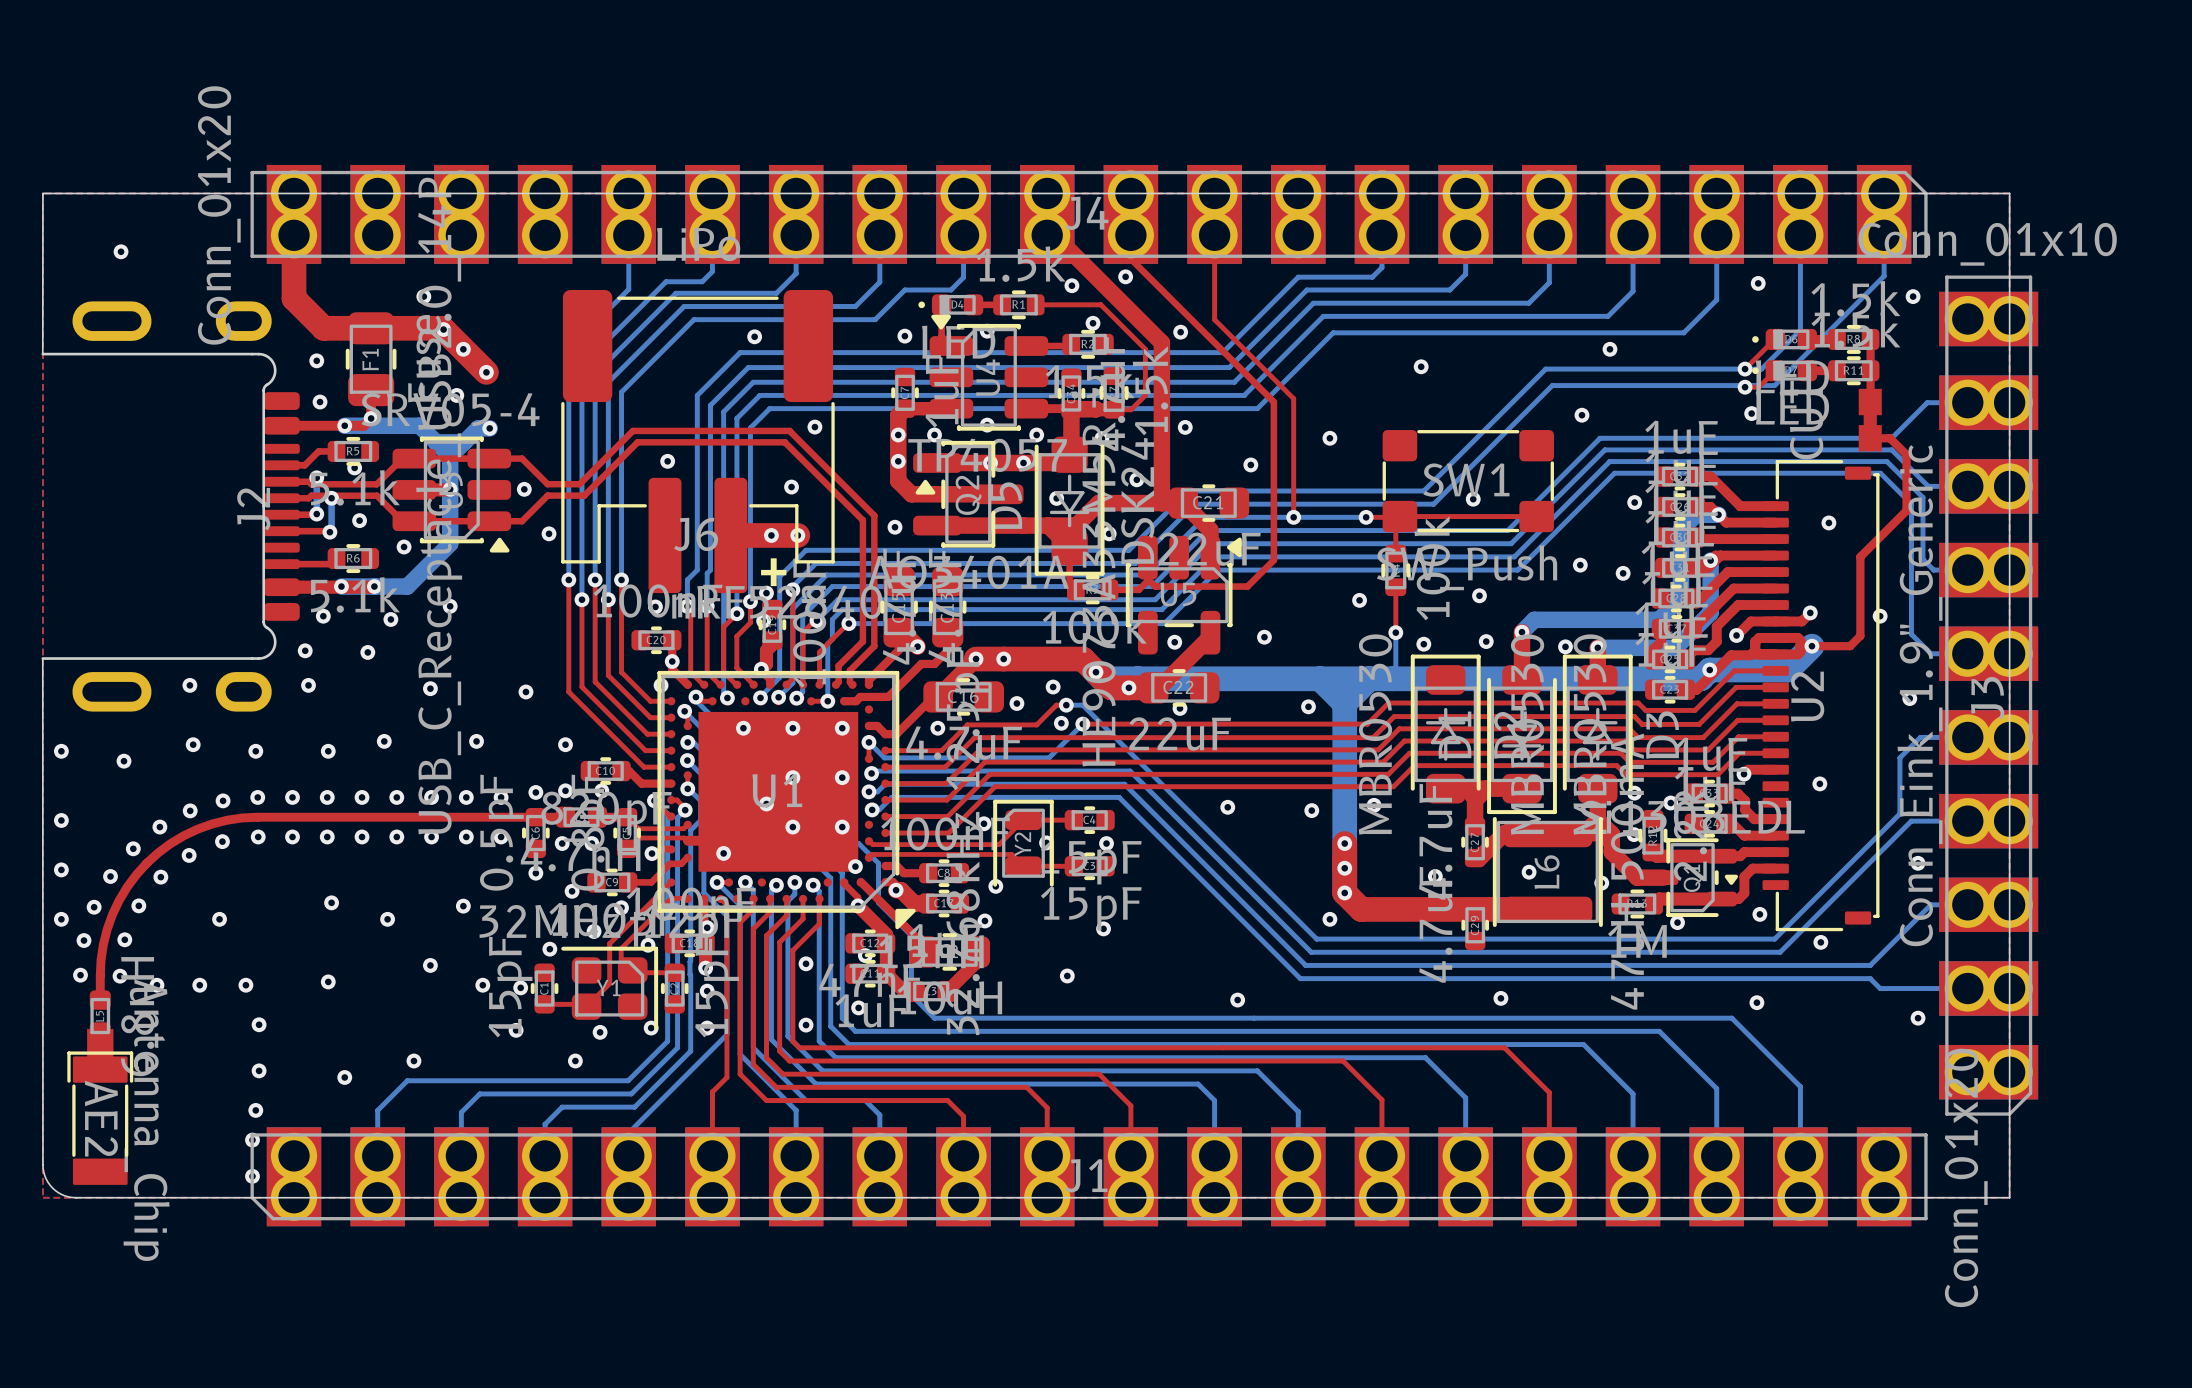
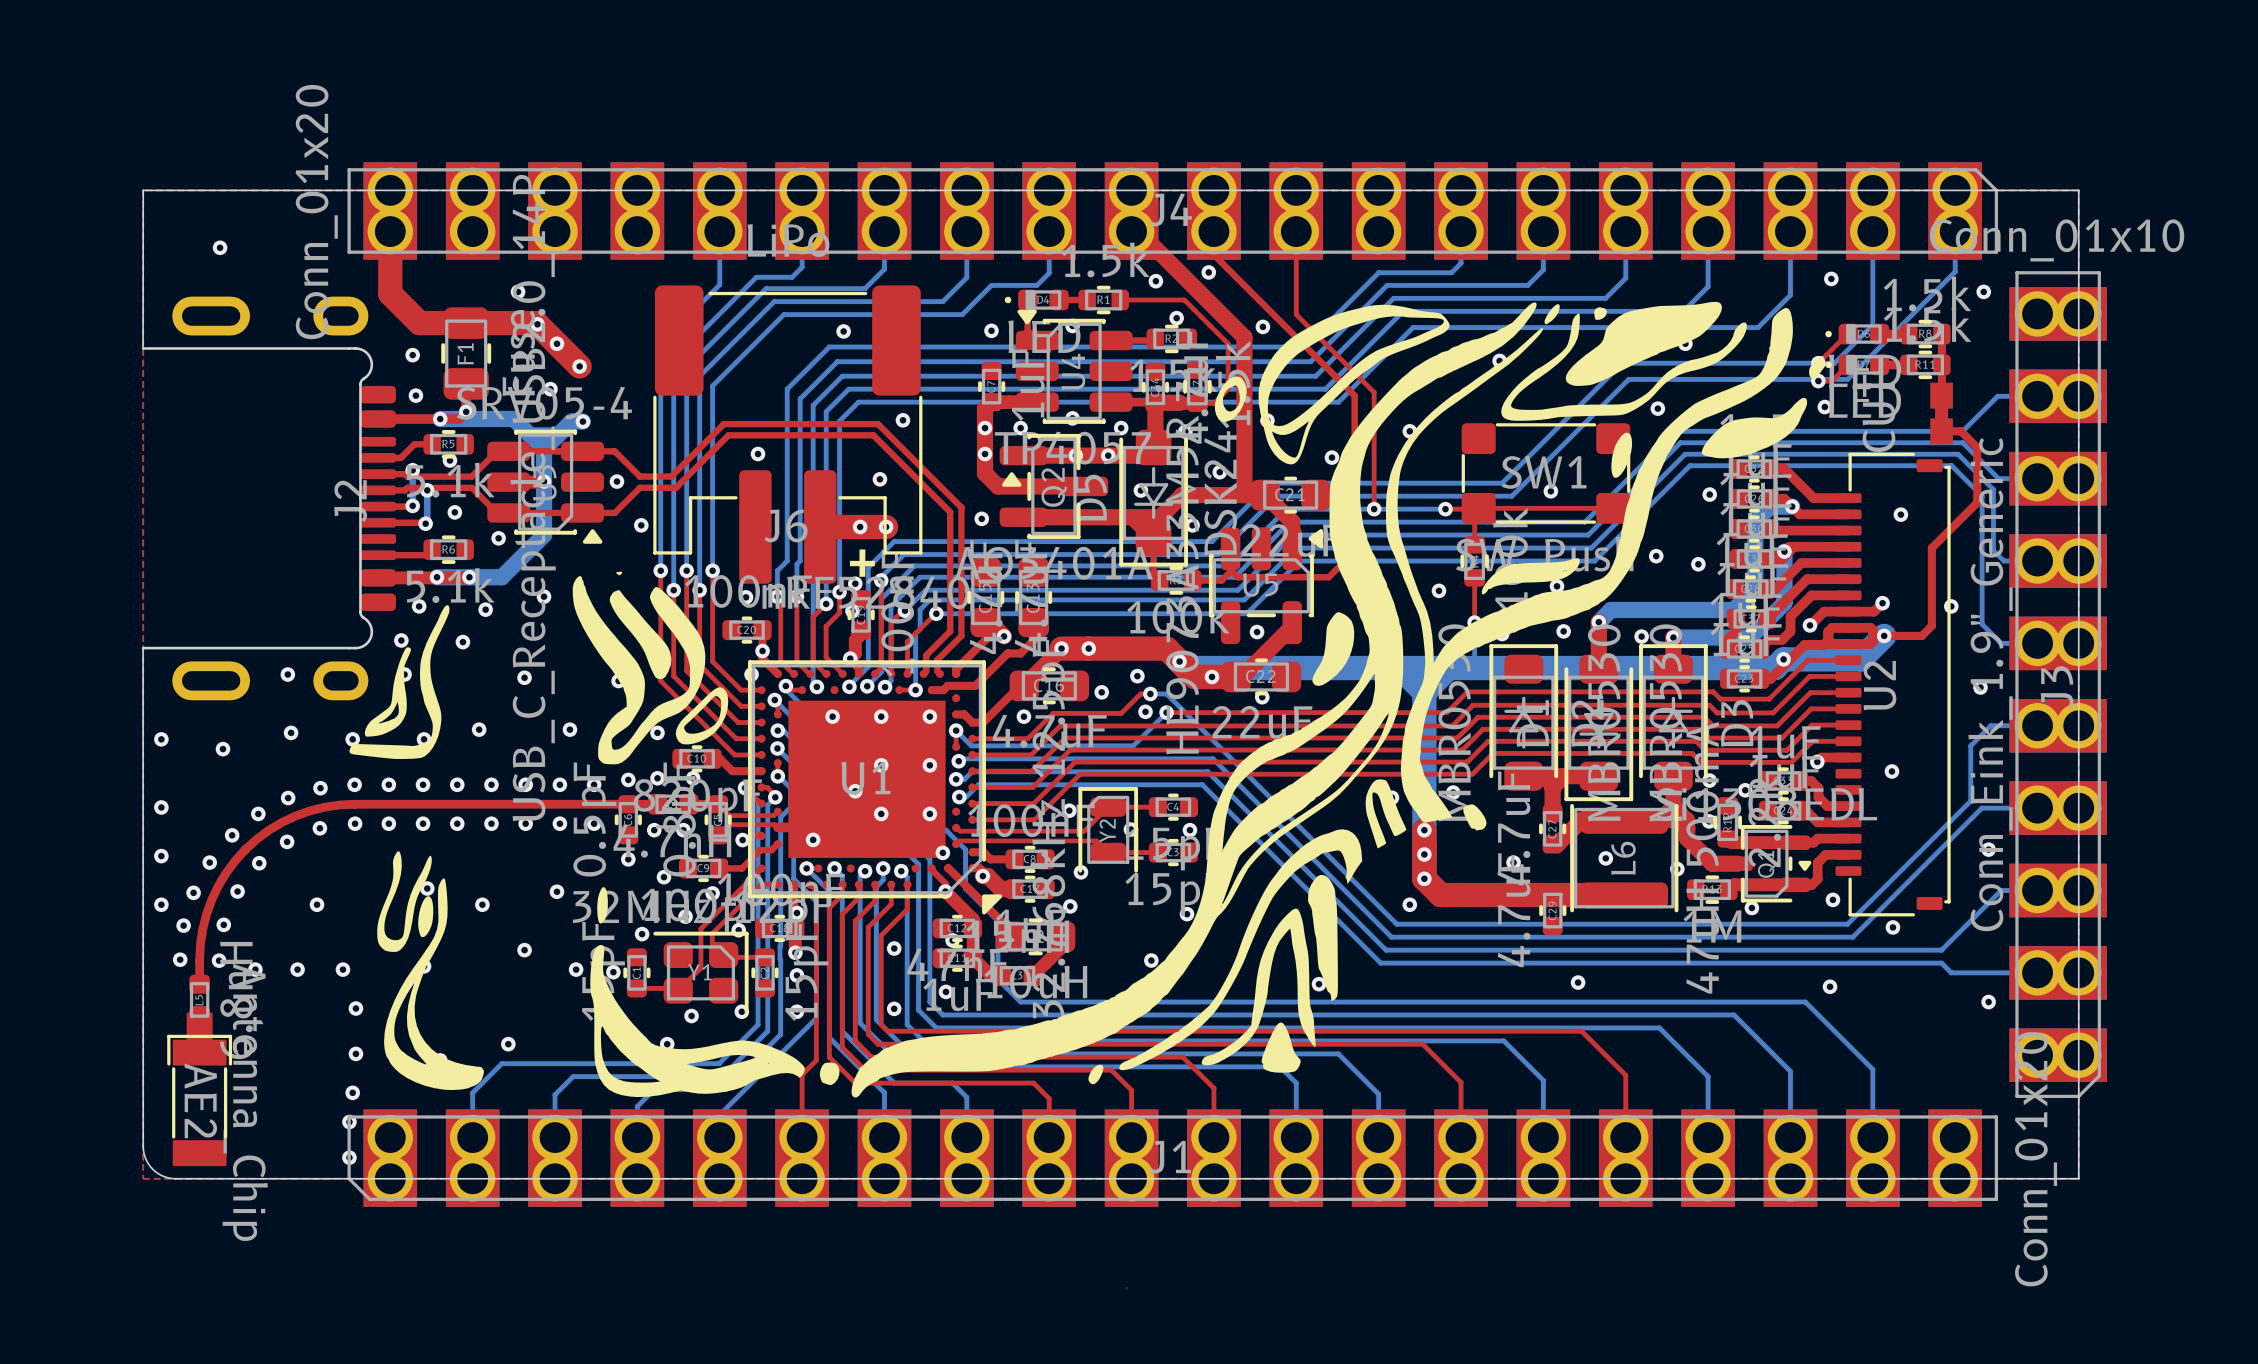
drawing: none -> [349, 301, 1825, 1289]

